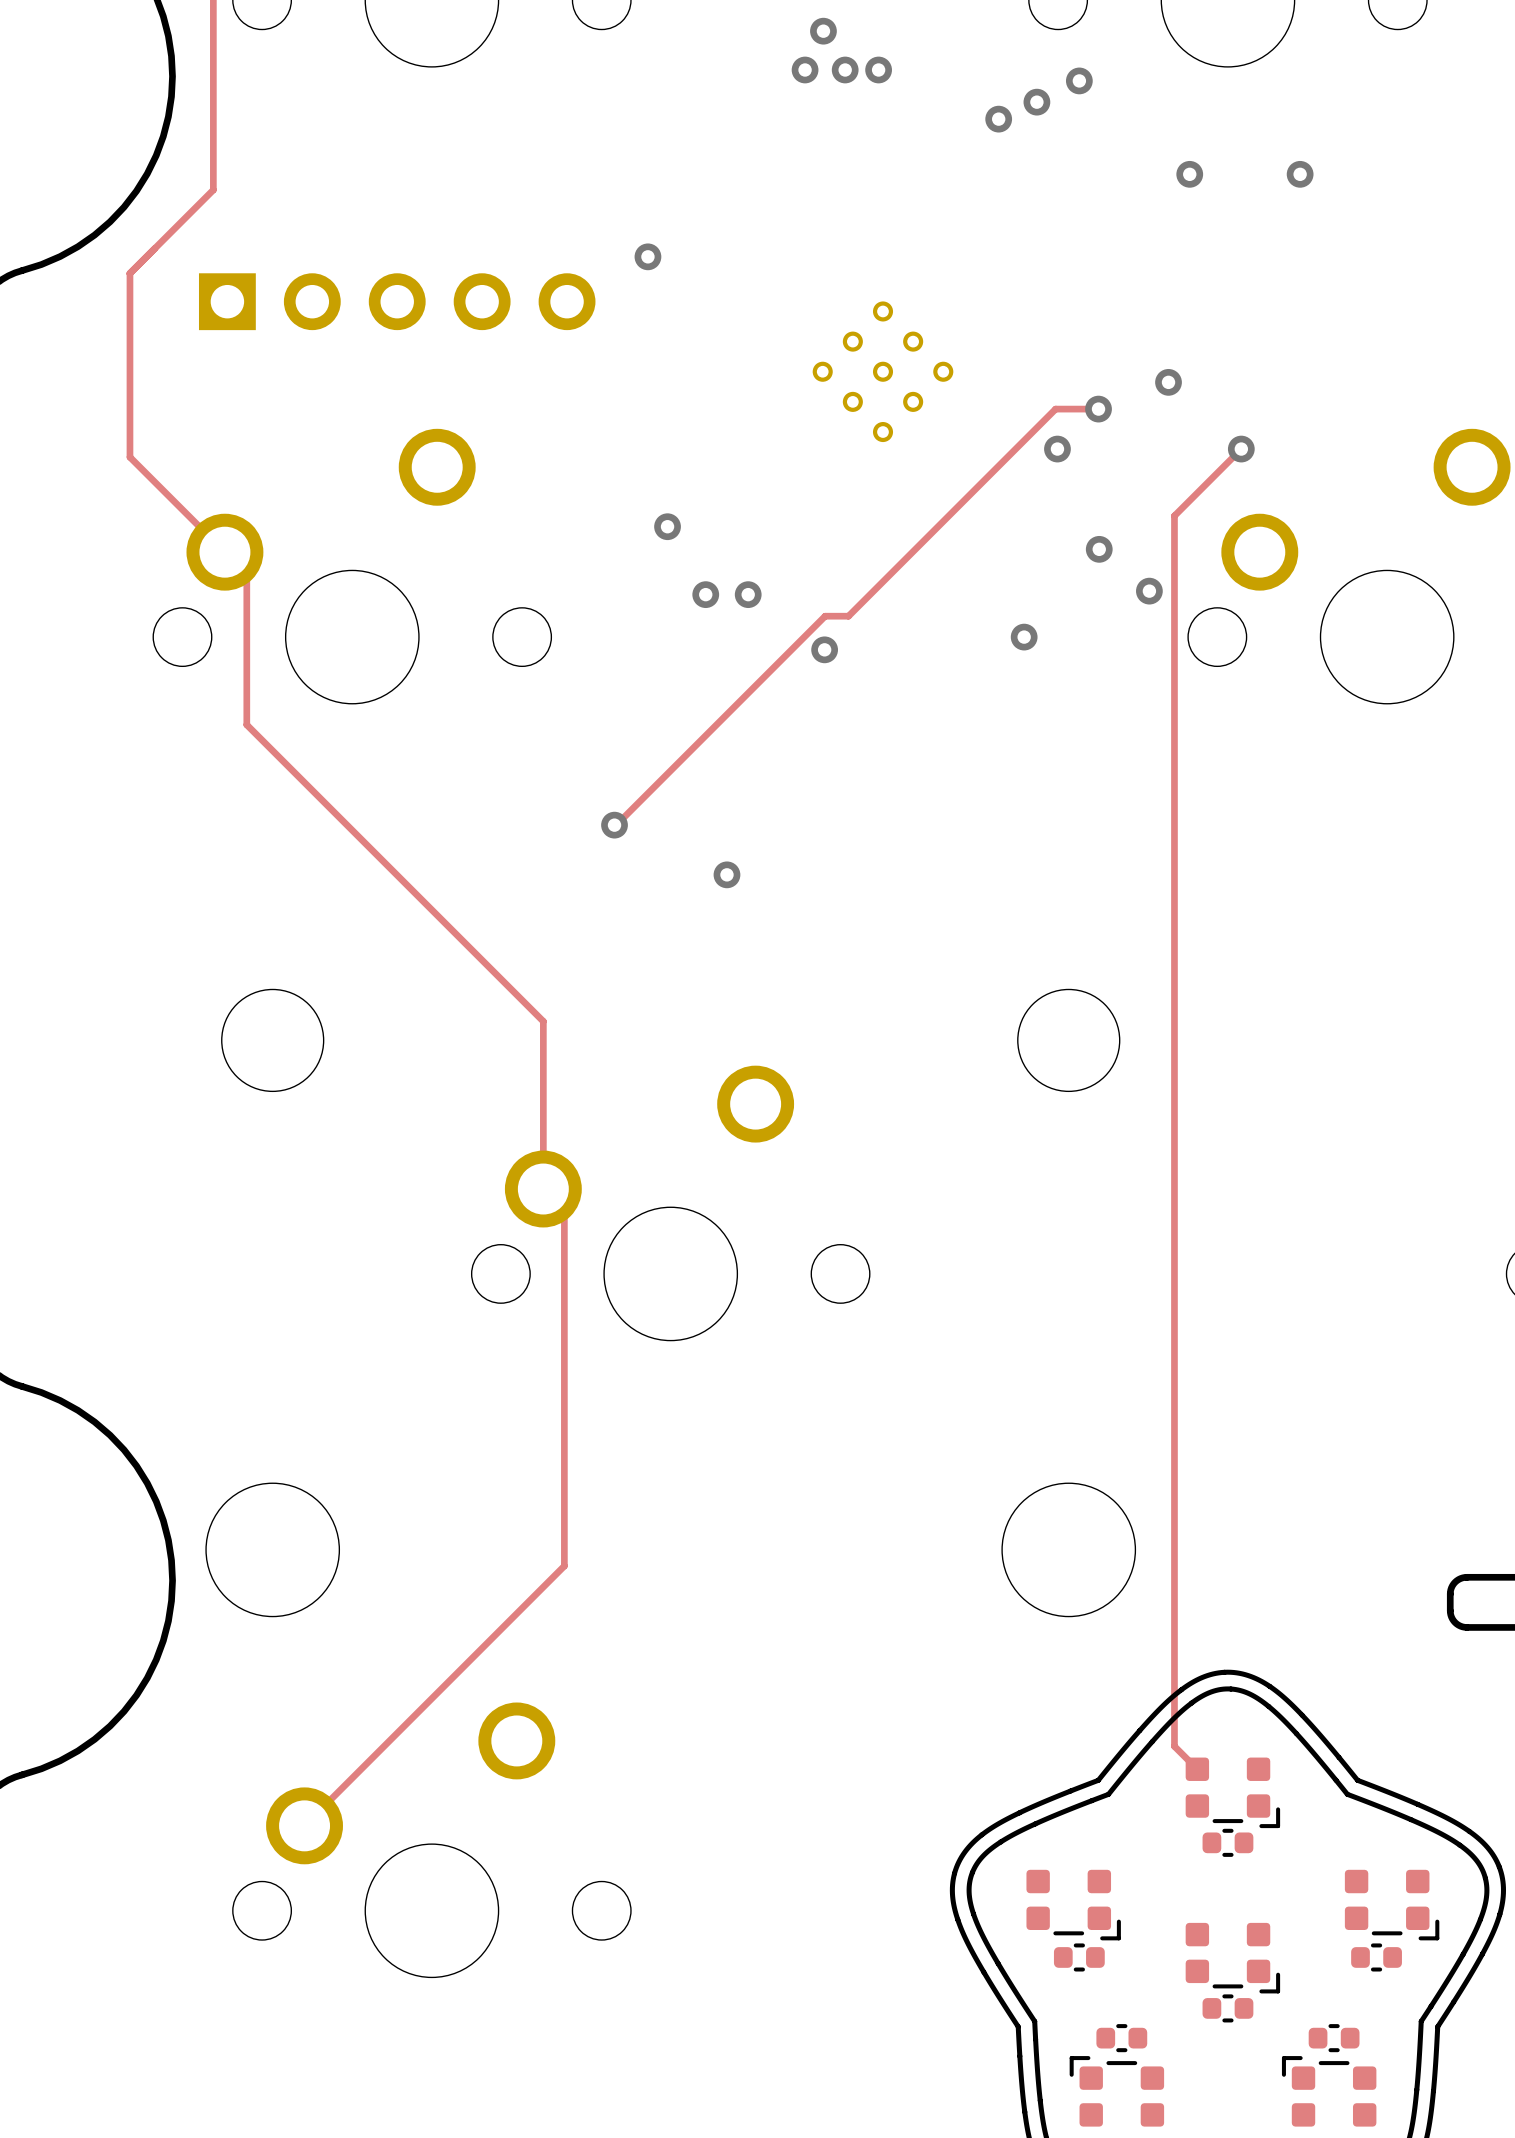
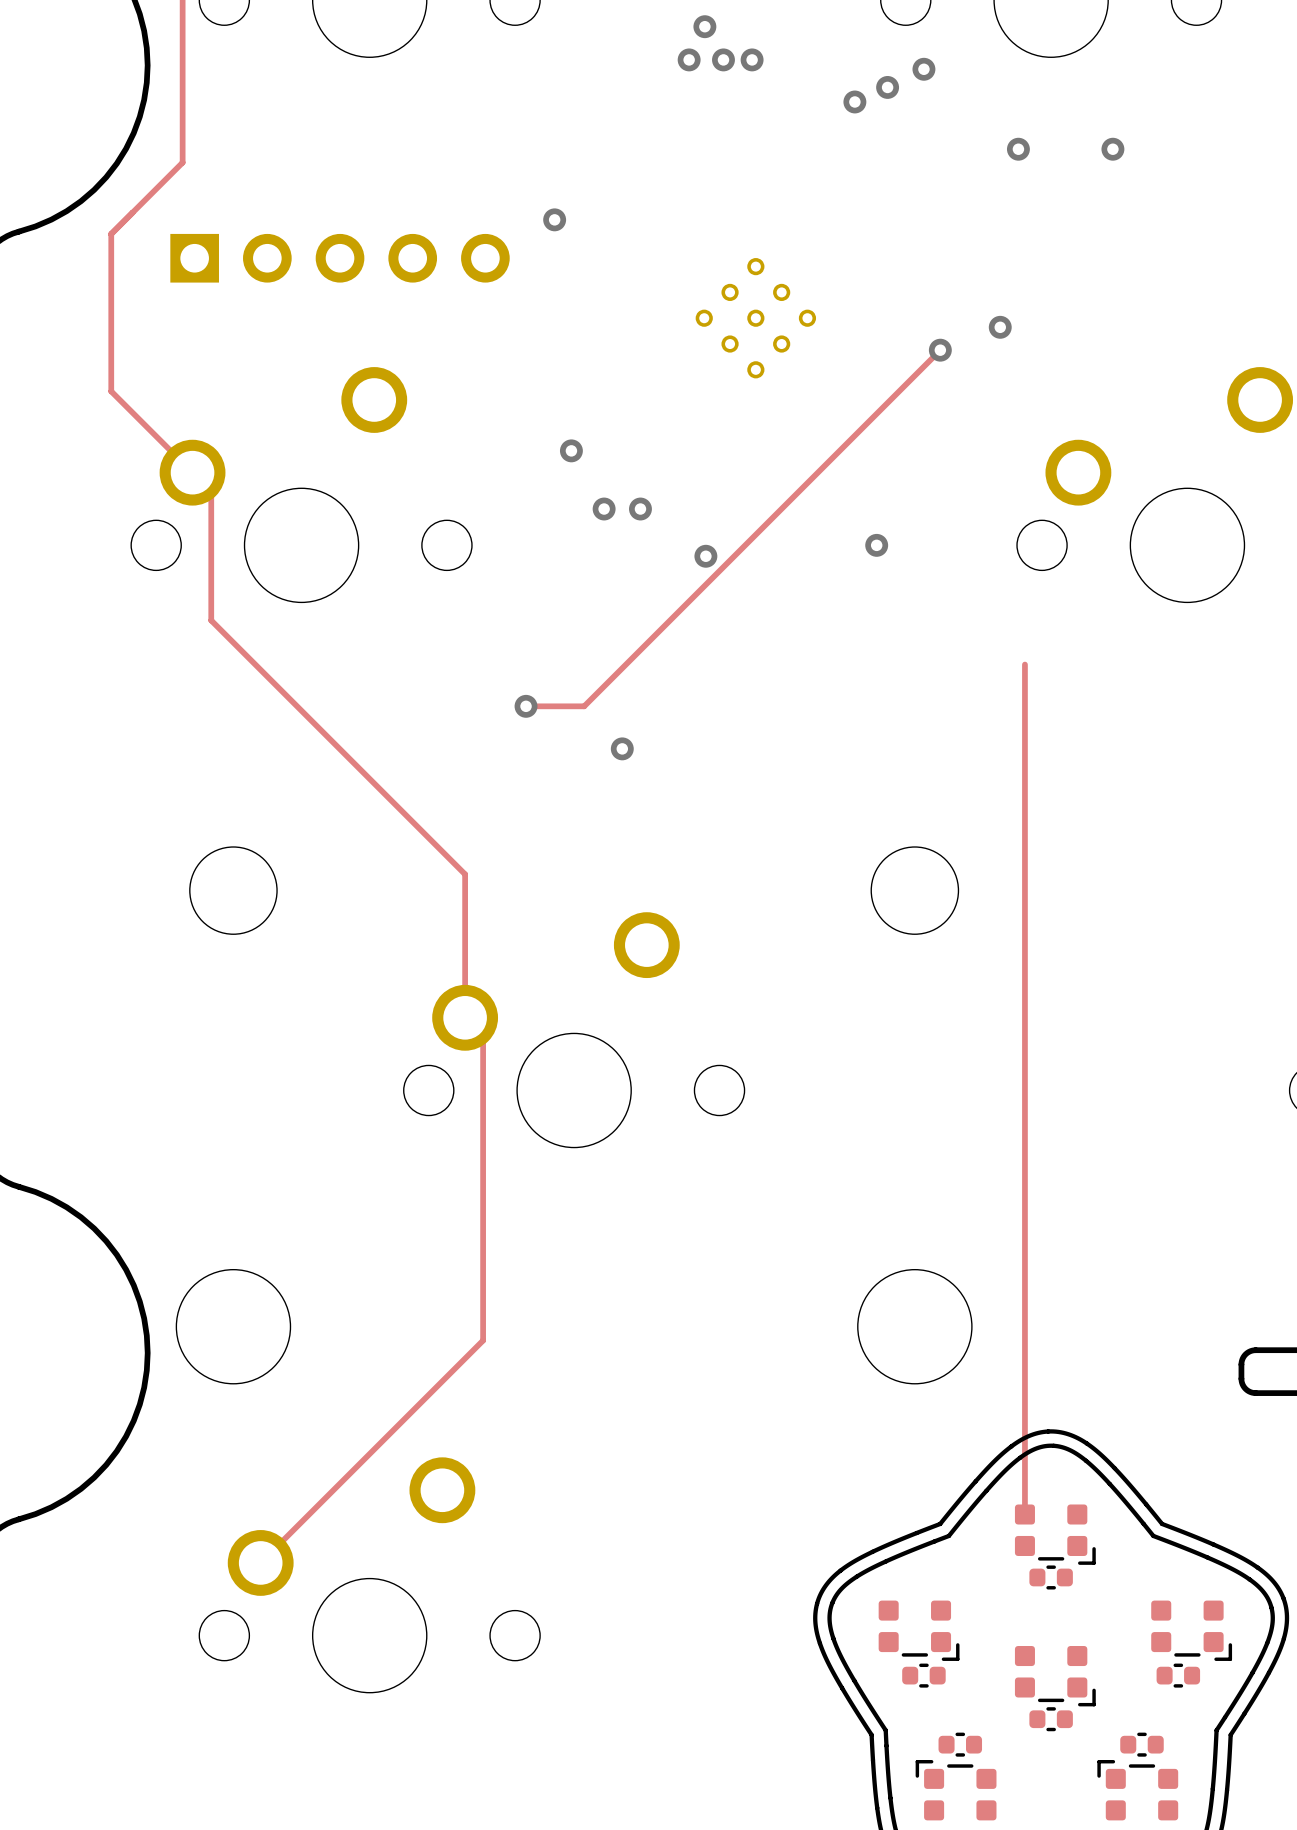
track: (1100, 407) (1098, 409) (1055, 409) (848, 616) (825, 616) (616, 825) -> (940, 350) (584, 706) (527, 706)
via: (1057, 449) -> none
track: (1241, 449) (1174, 515) (1174, 1746) (1197, 1769) -> (1024, 664) (1024, 1514)
via: (1241, 449) -> none
via: (1099, 549) -> none
via: (1149, 591) -> none

